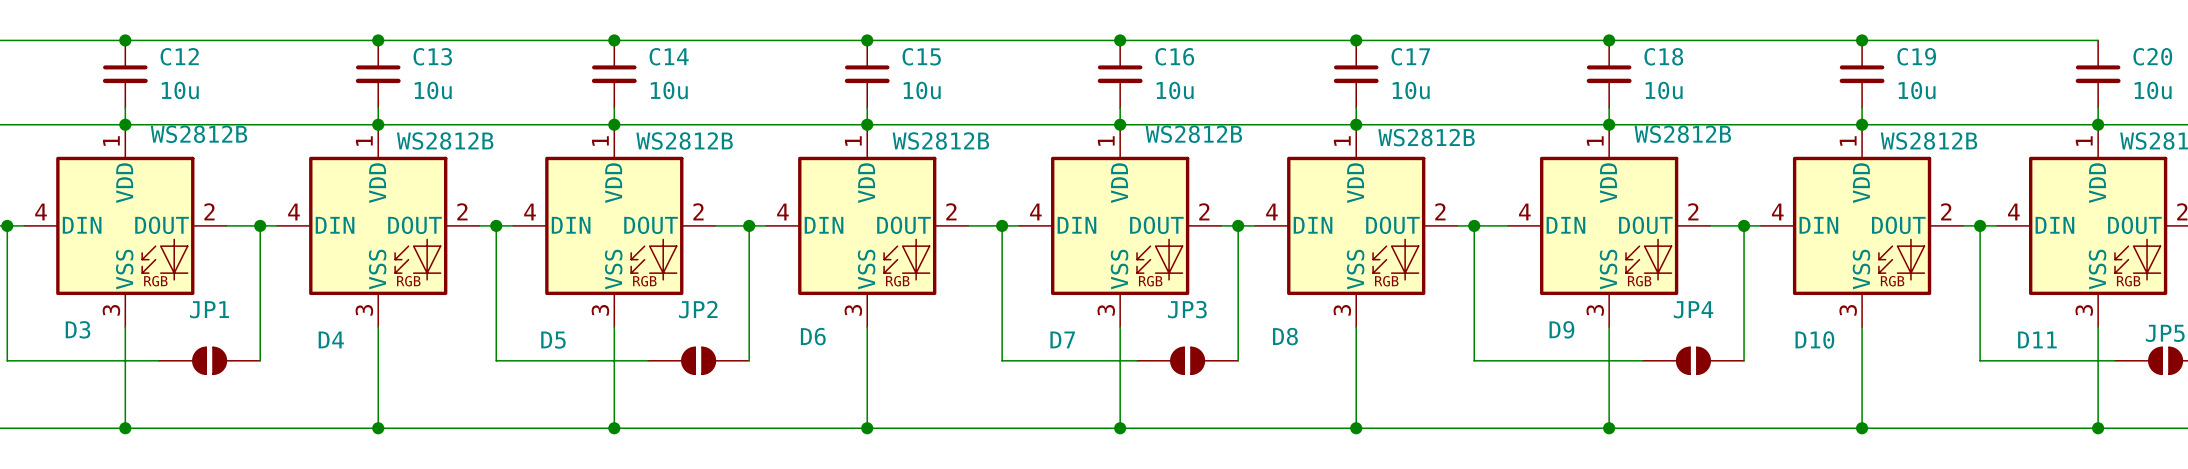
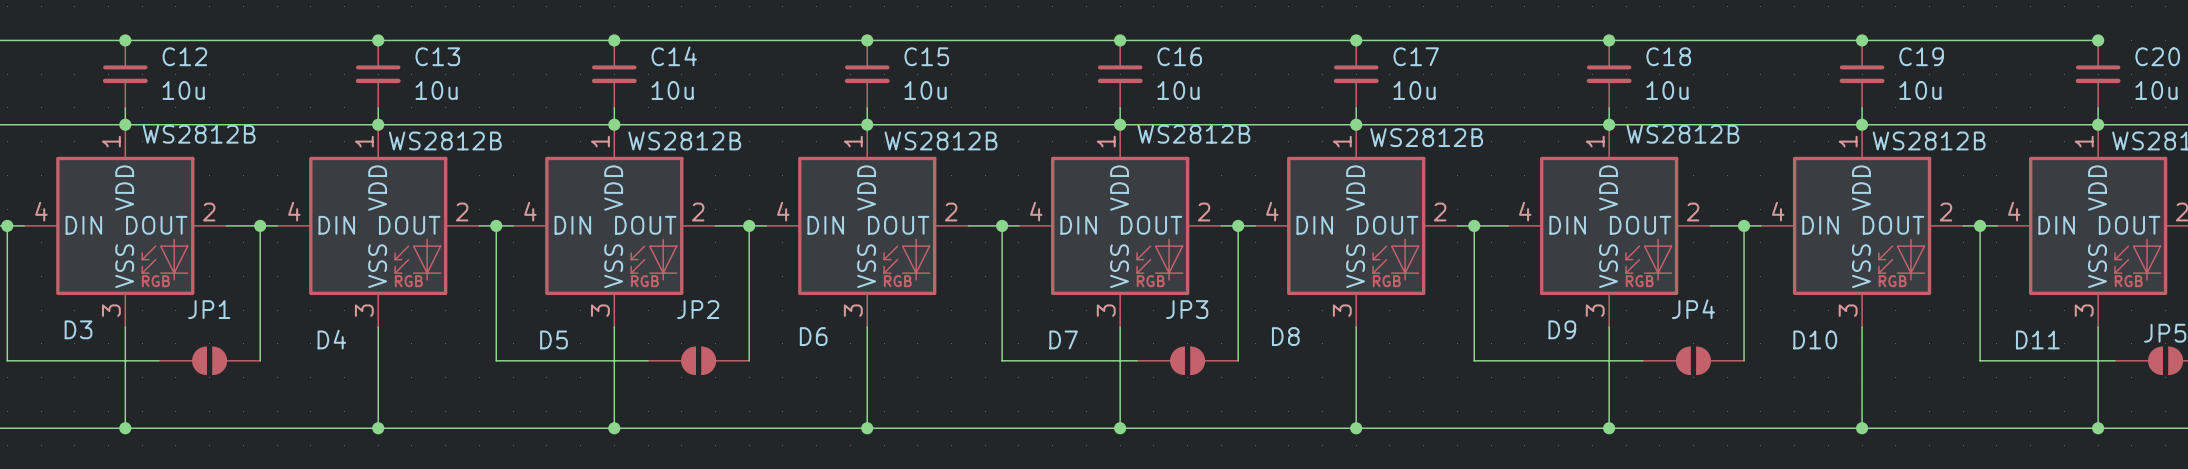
junction: none -> (2098, 40)

